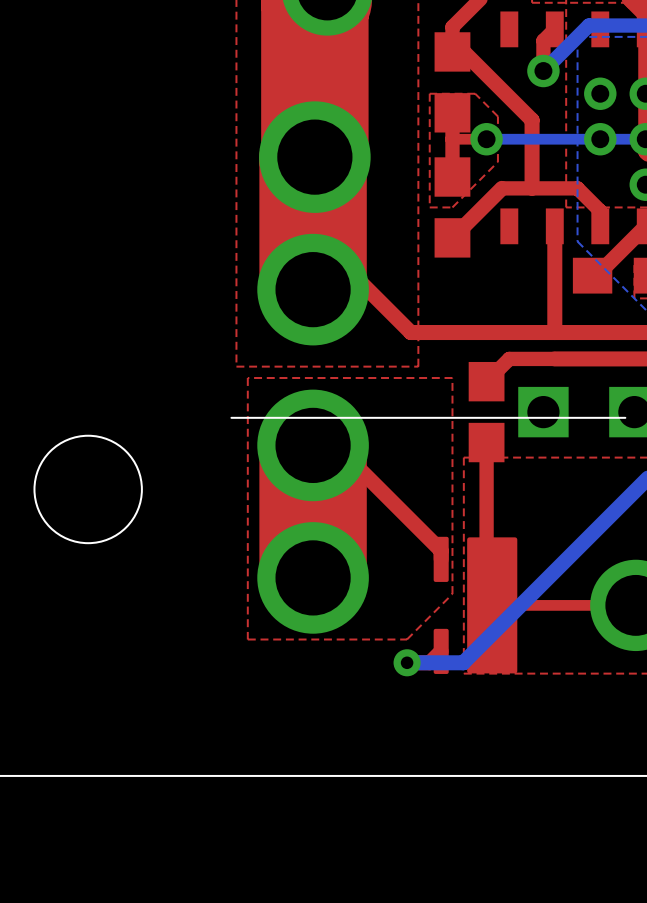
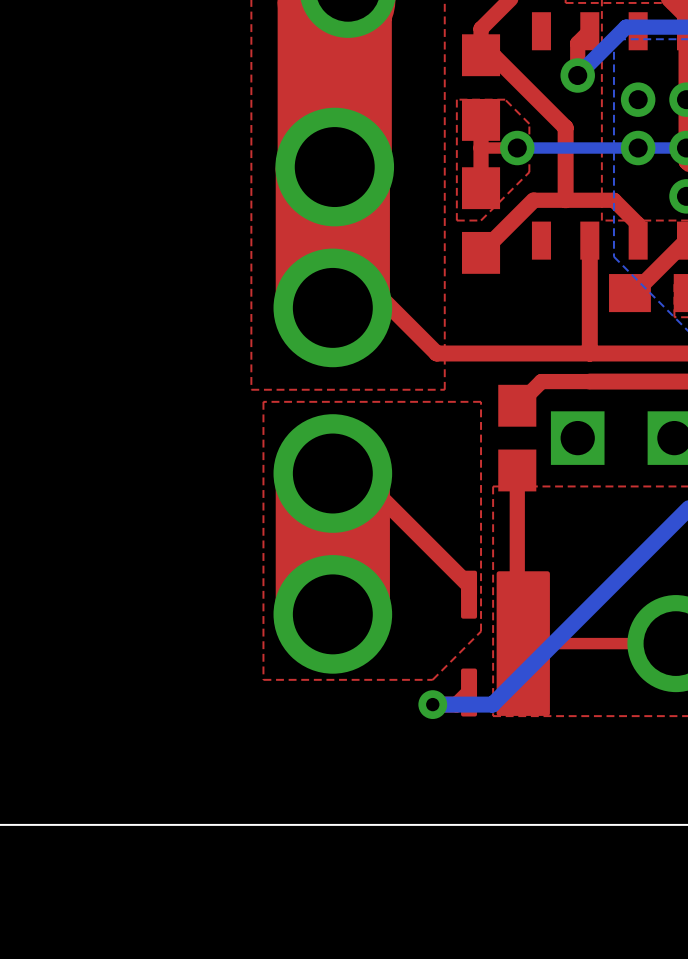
board edge: (625, 417) (231, 417) -> none
round board edge: [34, 435, 142, 544] -> none

